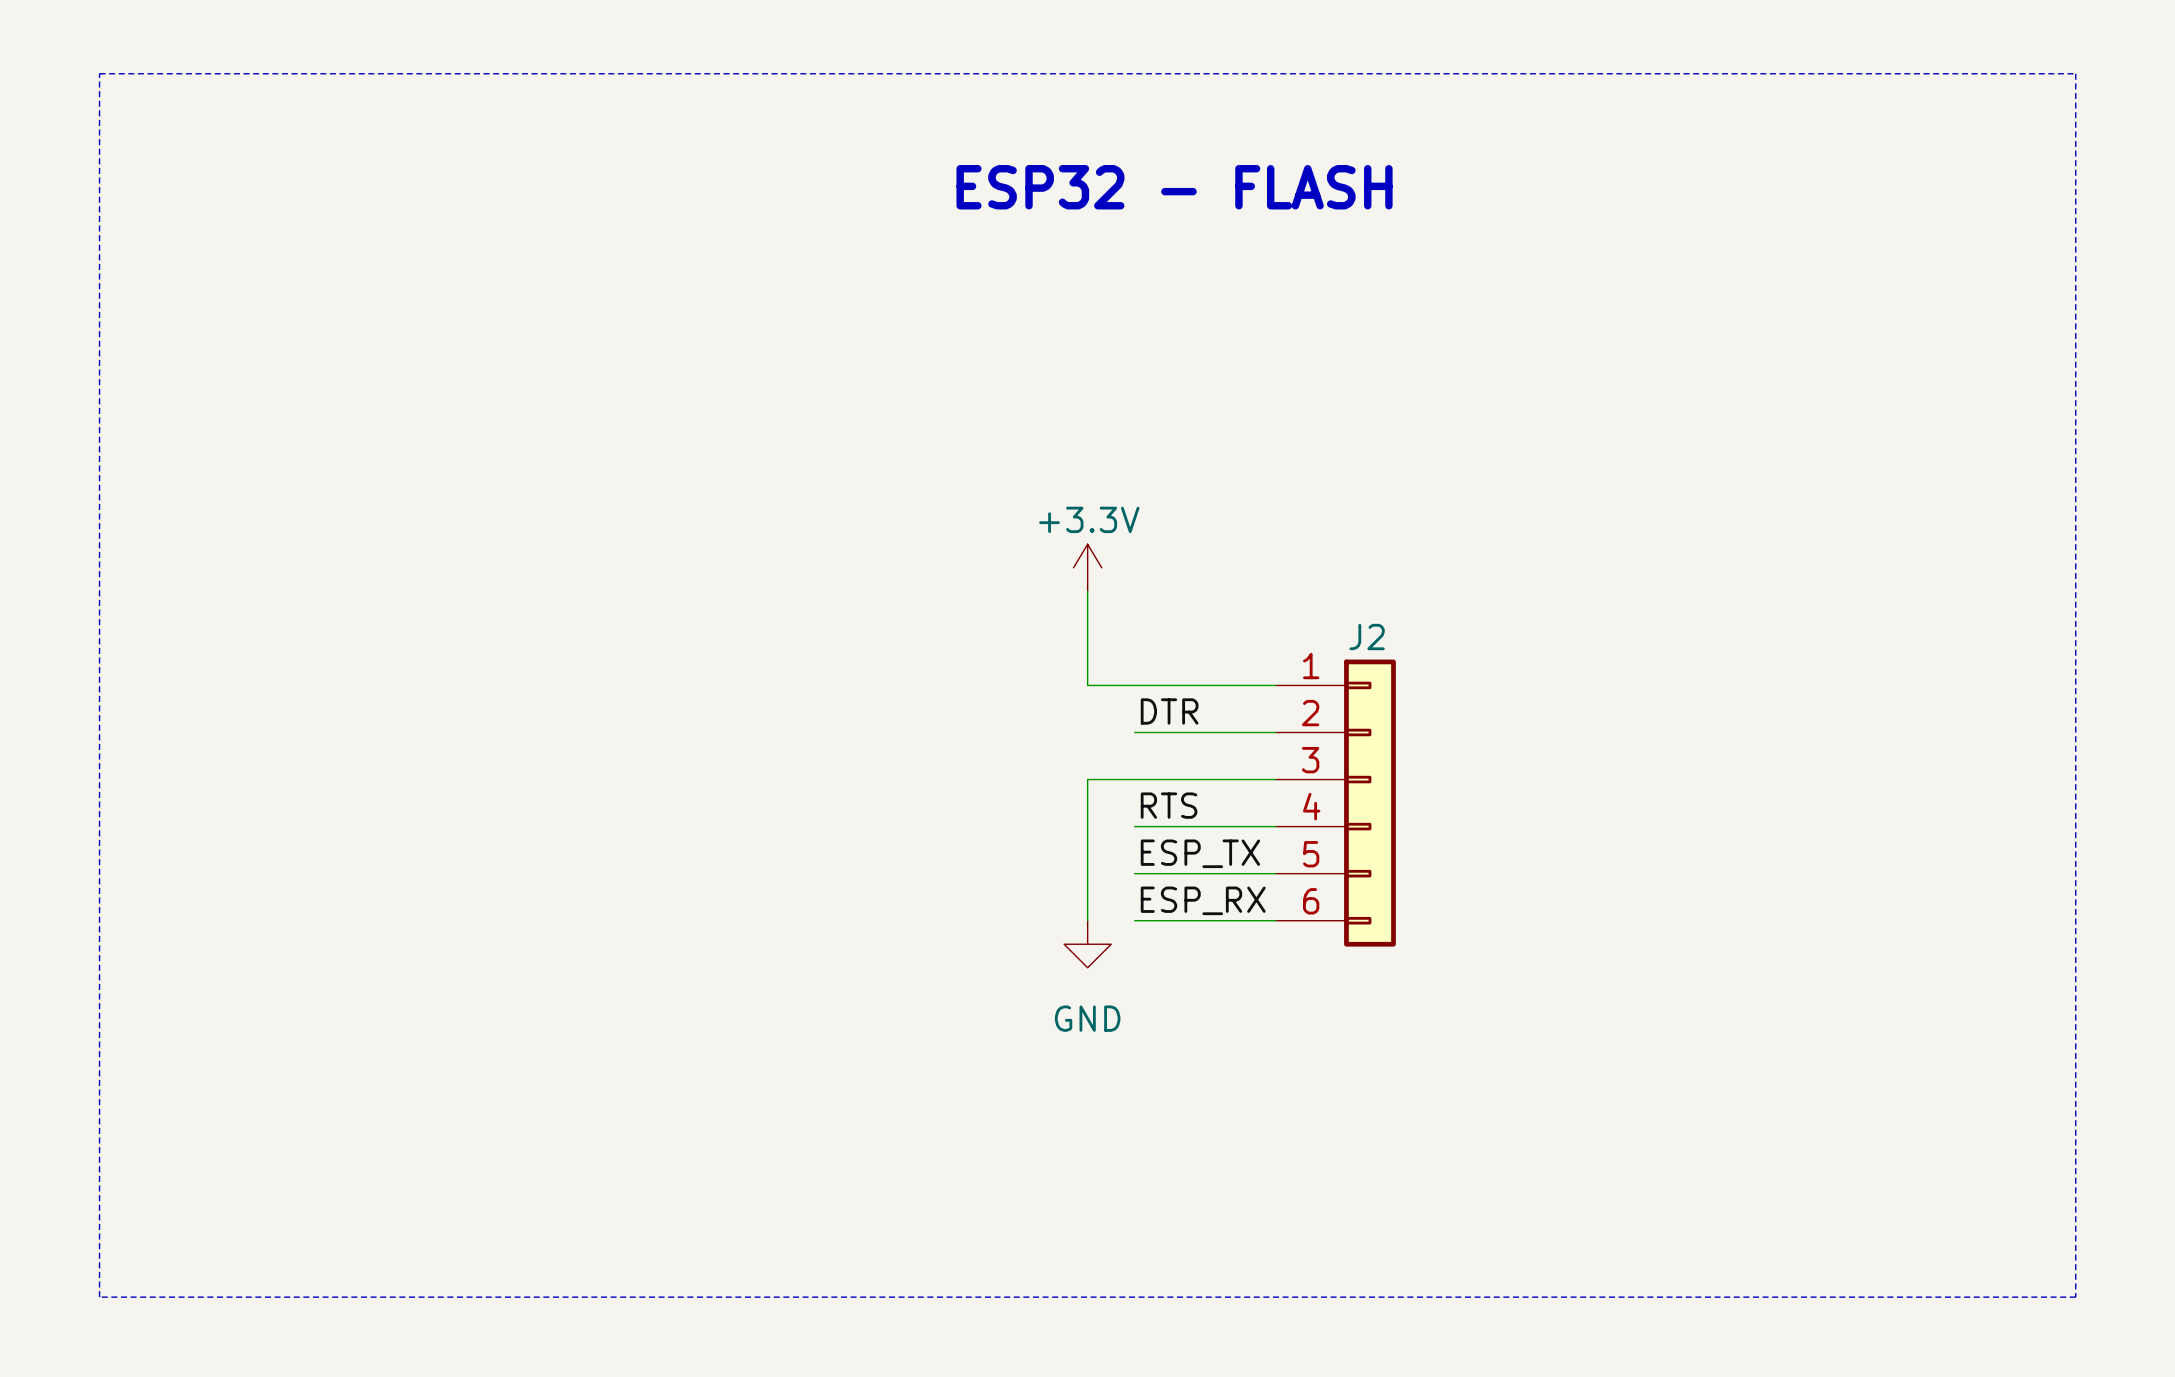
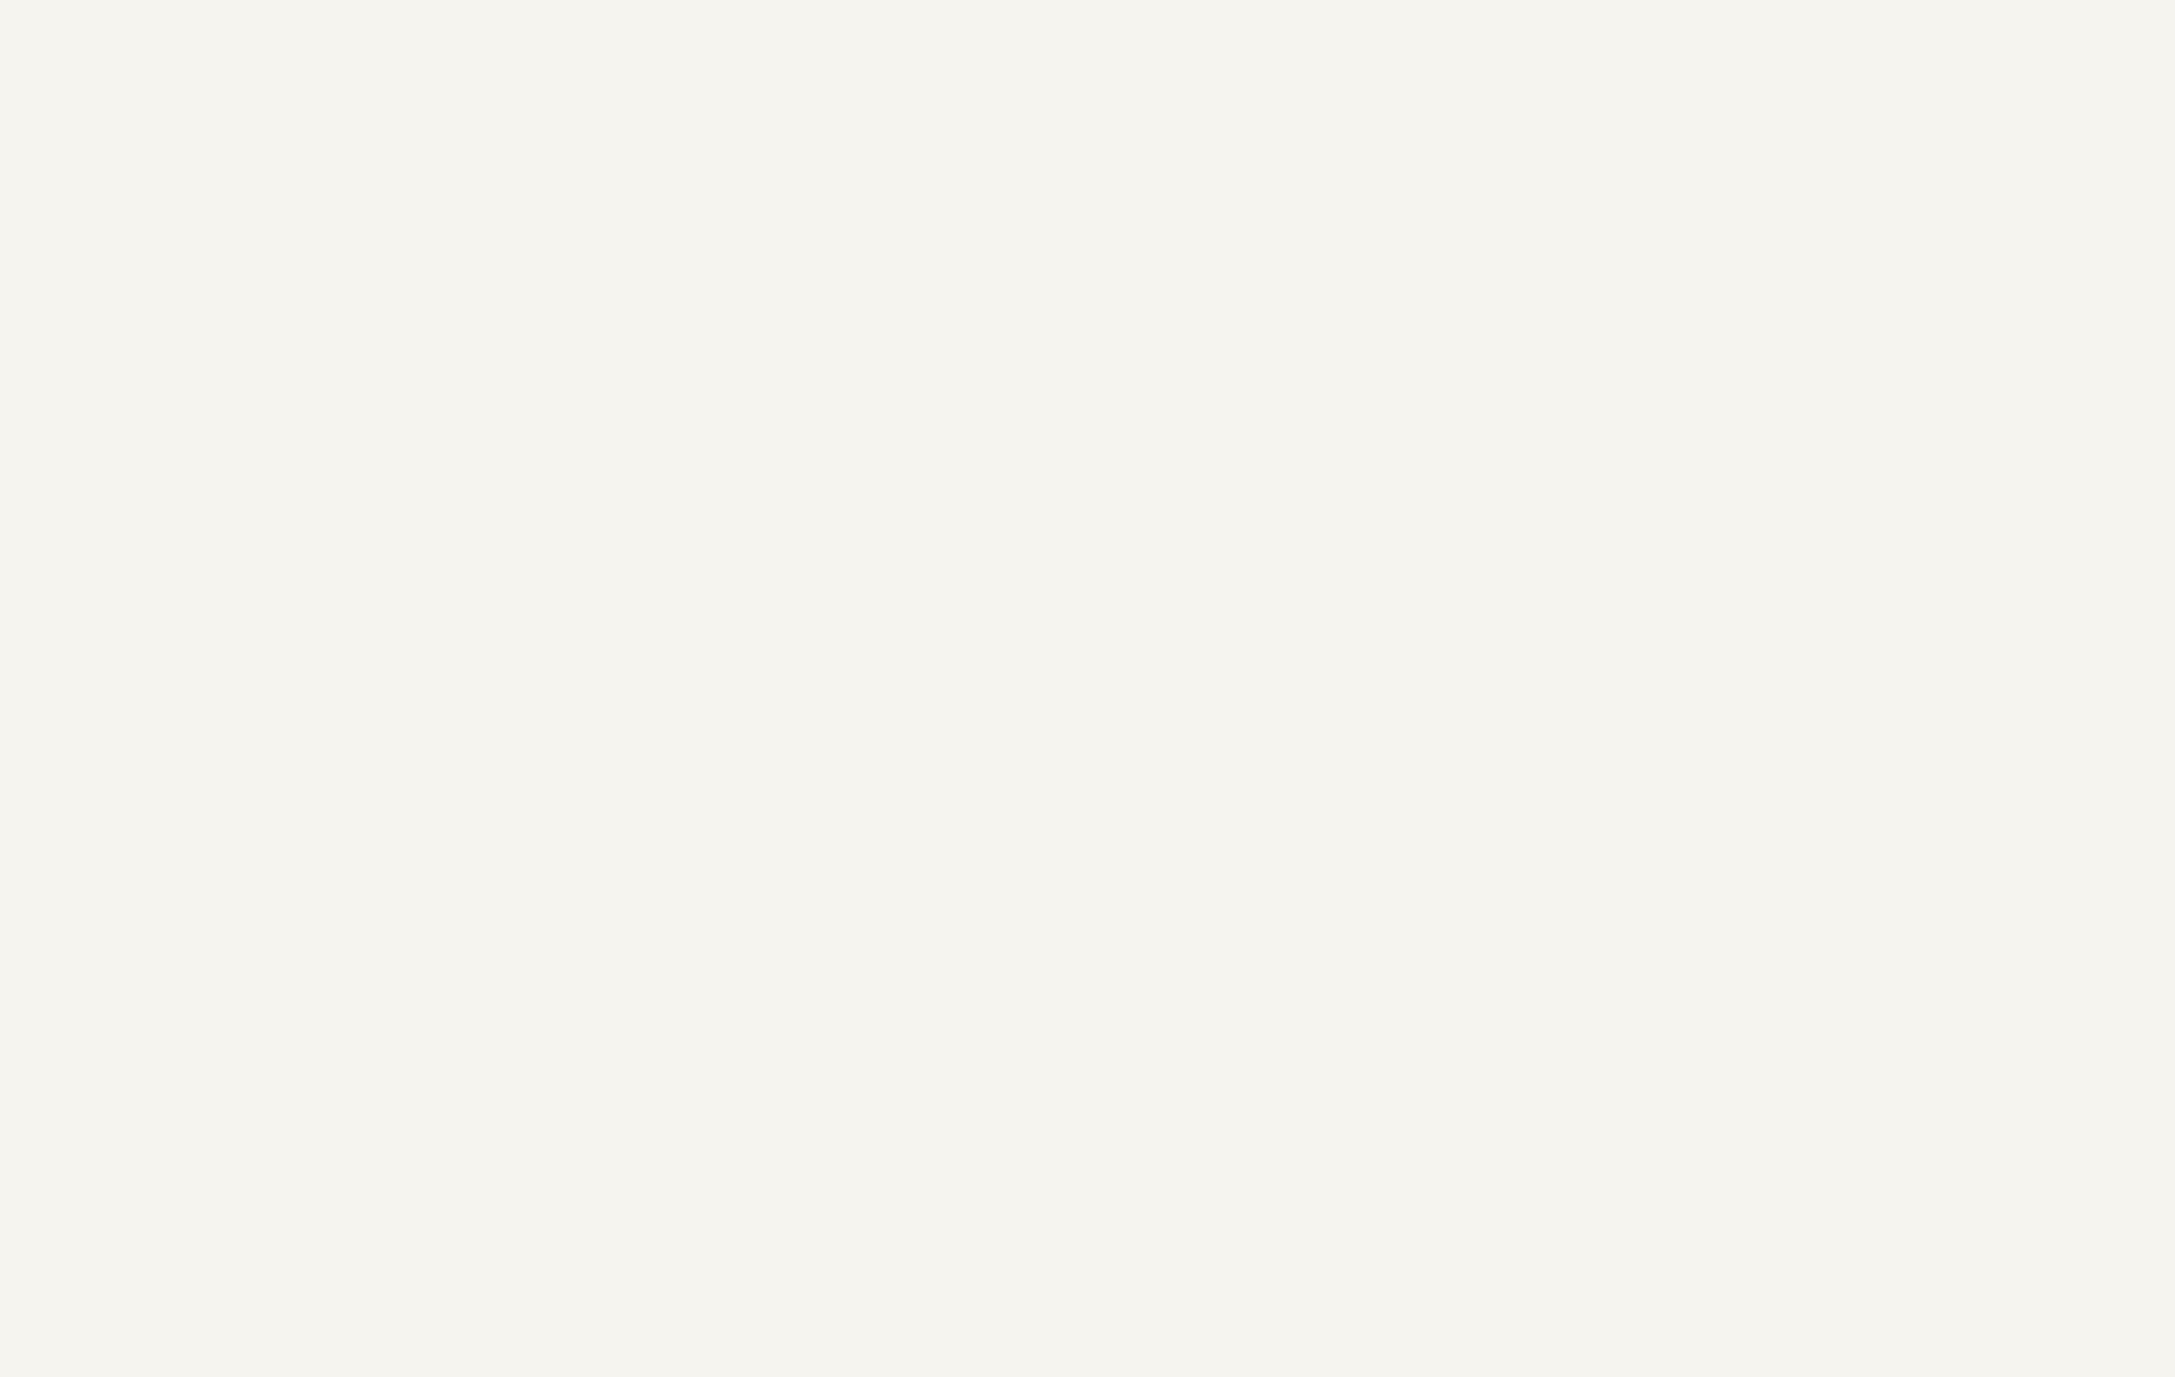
line: (99, 73) (2075, 73) (2075, 1297) (99, 1297) (99, 73) -> none
text: ESP32 - FLASH (1174, 187) -> none
power symbol: +3.3V (1087, 567) -> none
wire: (1087, 591) (1087, 685) (1275, 685) -> none
label: DTR (1169, 711) -> none
wire: (1134, 732) (1275, 732) -> none
wire: (1275, 779) (1087, 779) (1087, 920) -> none
J2: (1335, 803) -> none
label: RTS (1169, 805) -> none
wire: (1134, 826) (1275, 826) -> none
label: ESP_TX (1200, 853) -> none
wire: (1134, 873) (1275, 873) -> none
label: ESP_RX (1203, 900) -> none
wire: (1134, 920) (1275, 920) -> none
power symbol: GND (1087, 944) -> none

